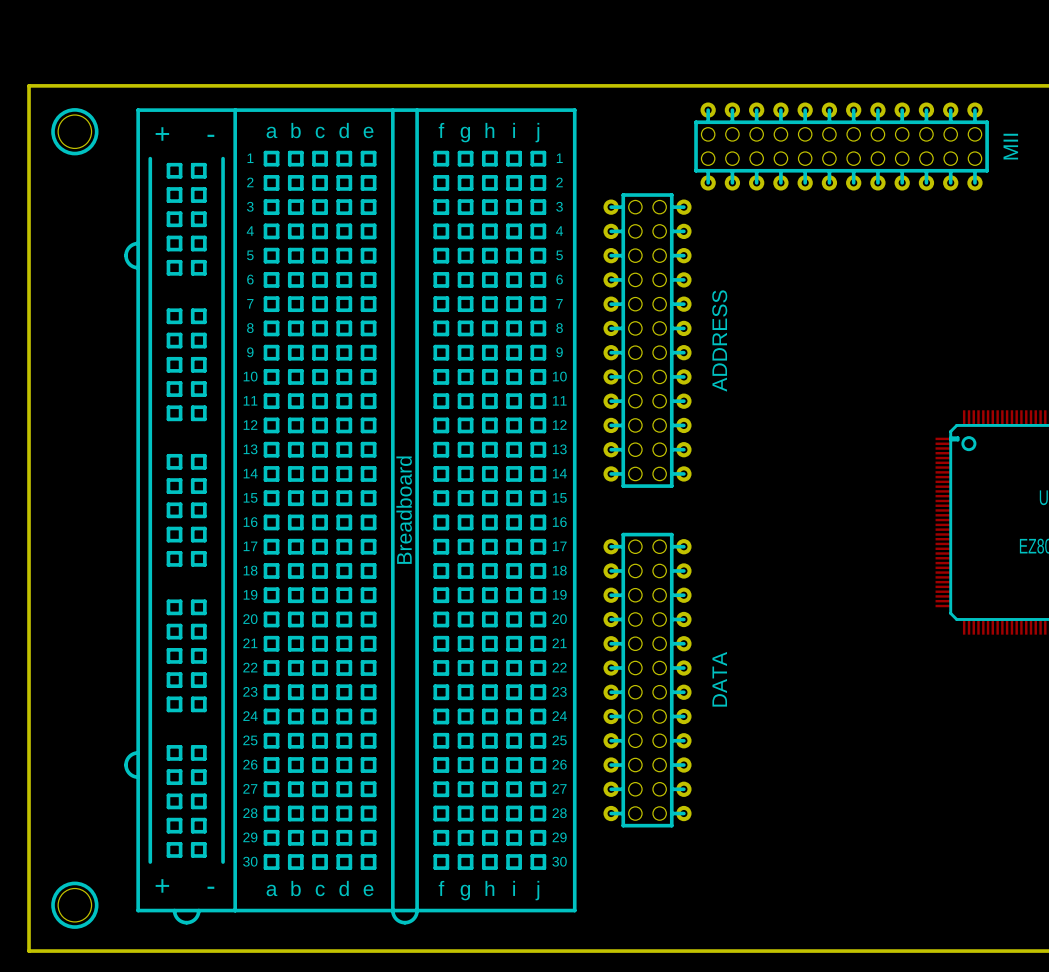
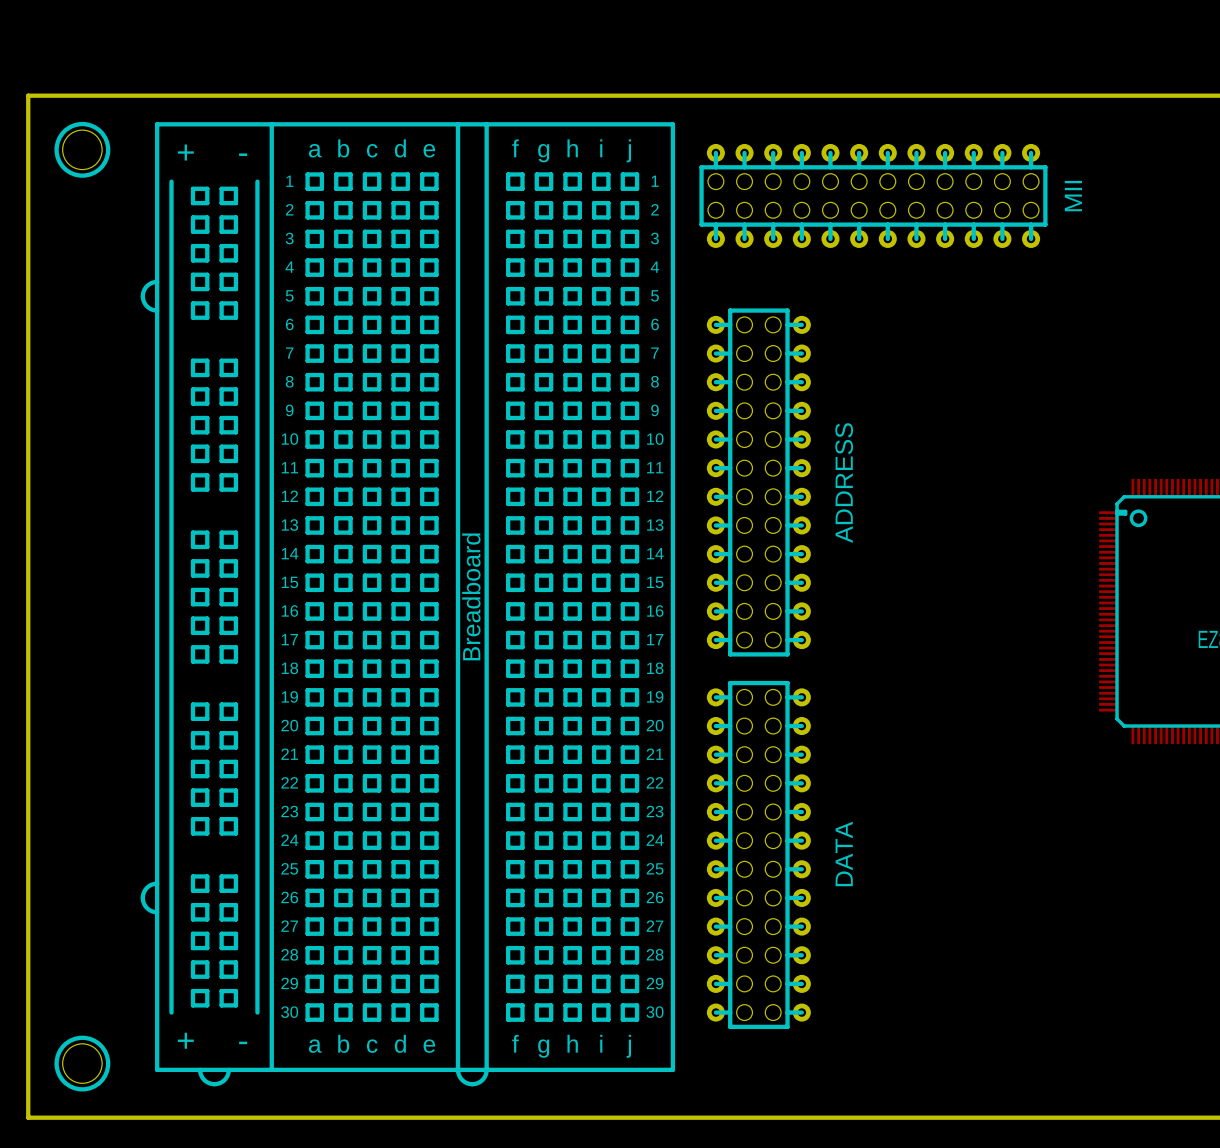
part position: (841, 146) -> (873, 195)
part position: (647, 340) -> (758, 482)
part position: (647, 680) -> (758, 854)

